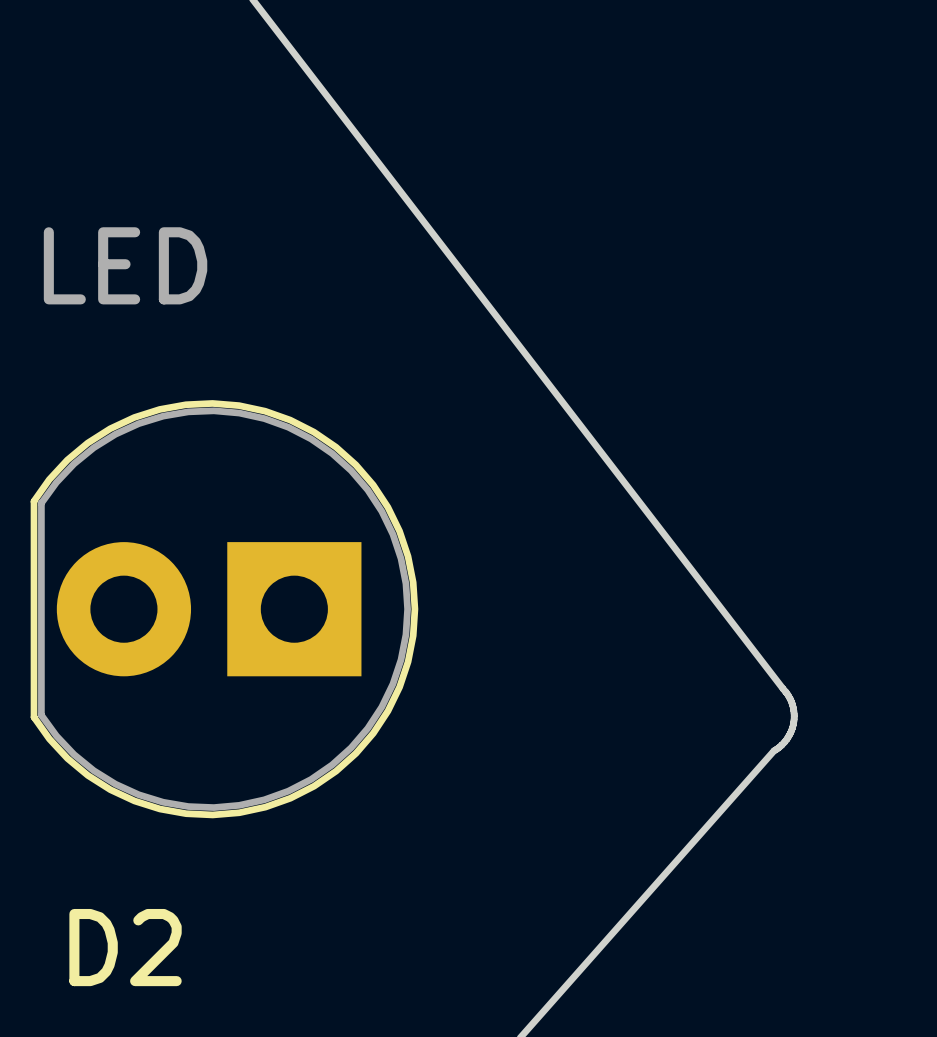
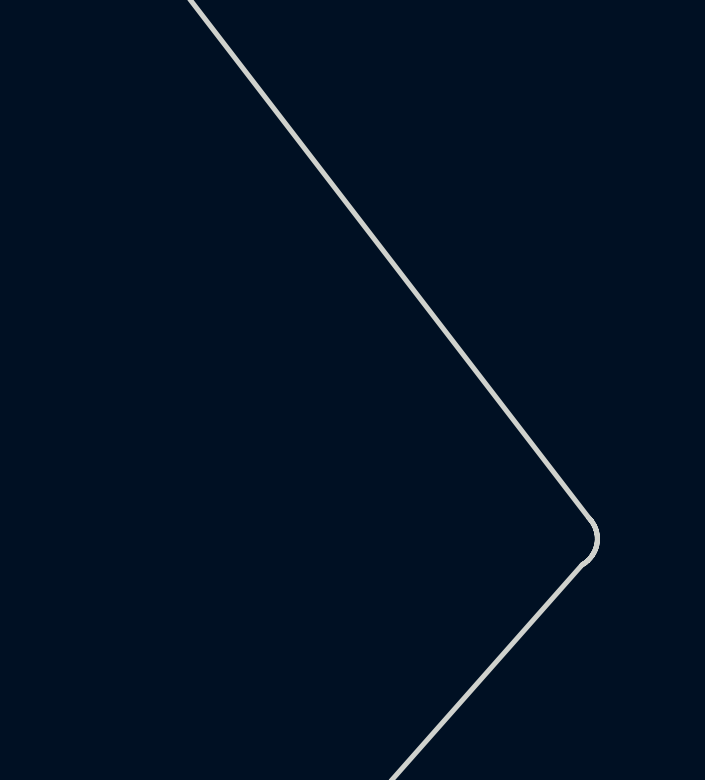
D2: LED (224, 609) -> none

